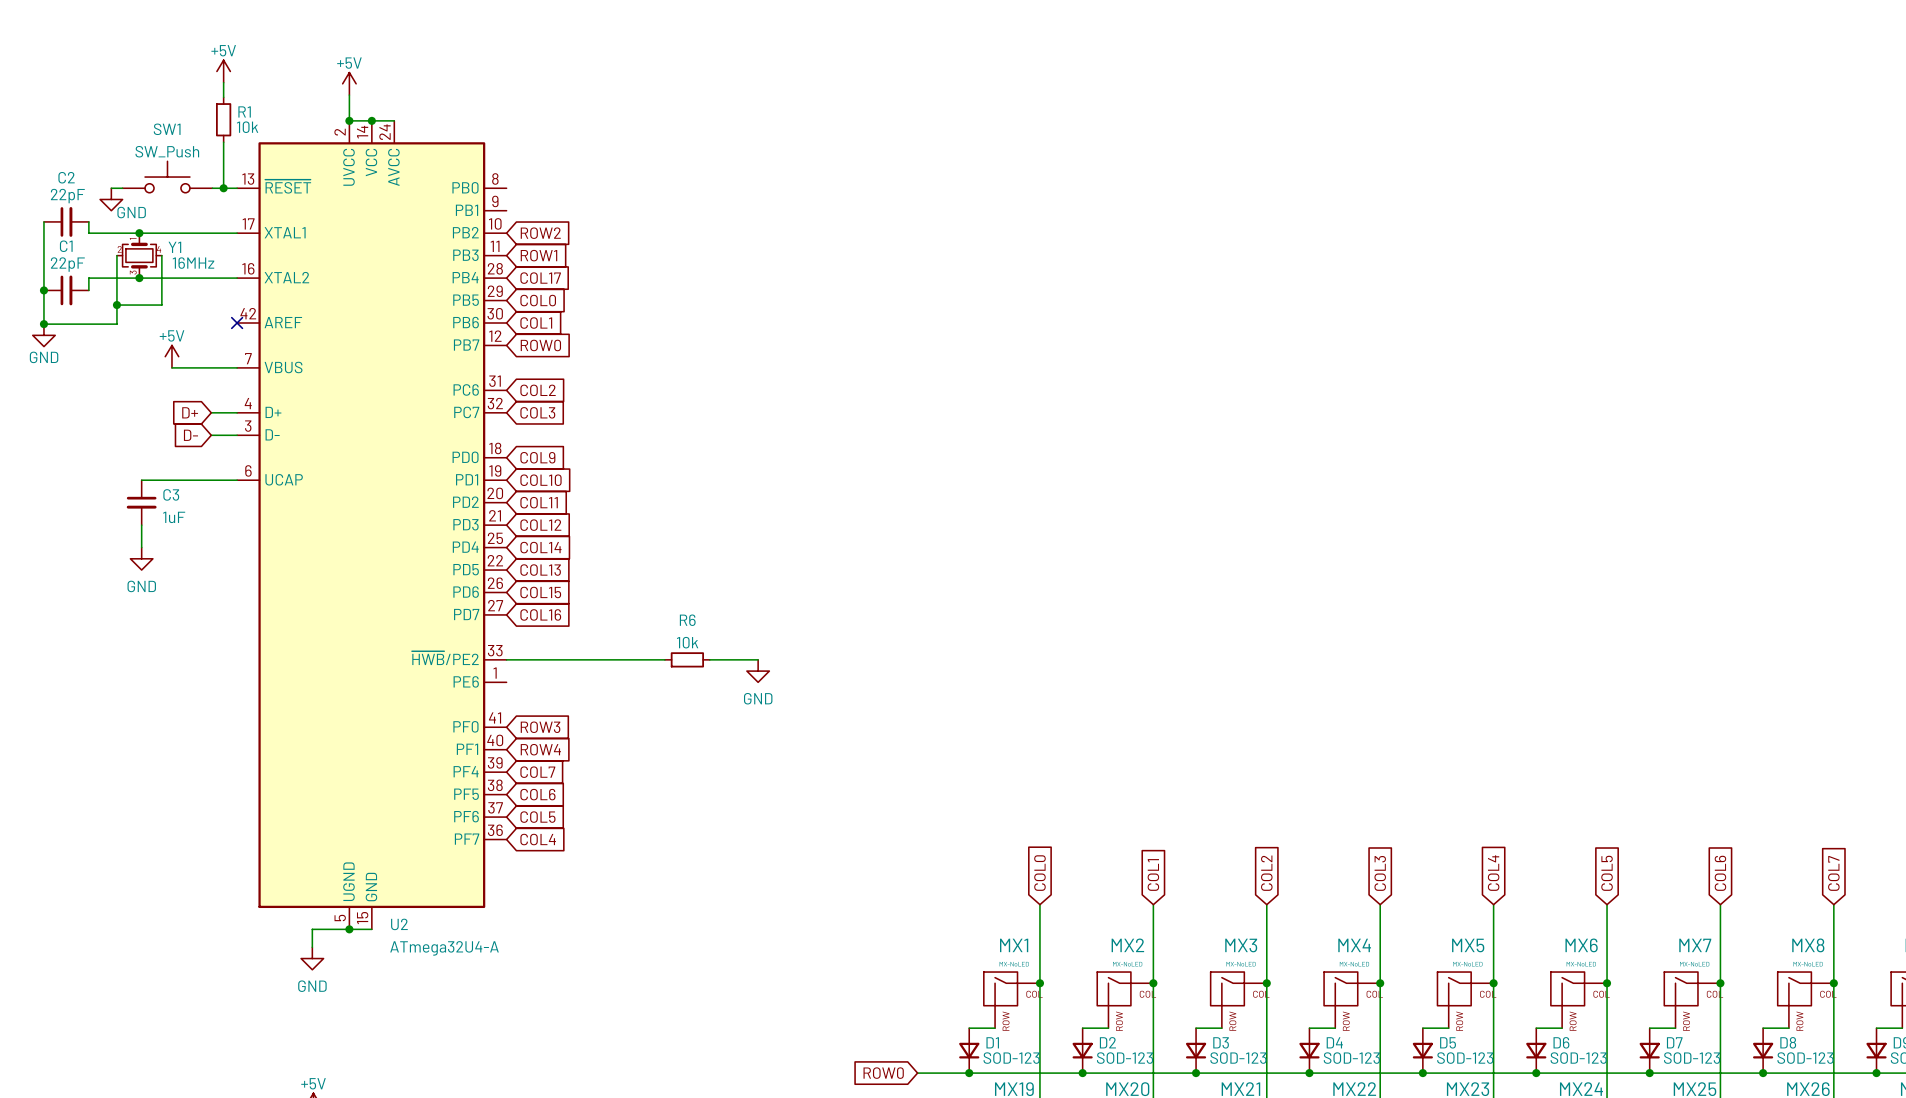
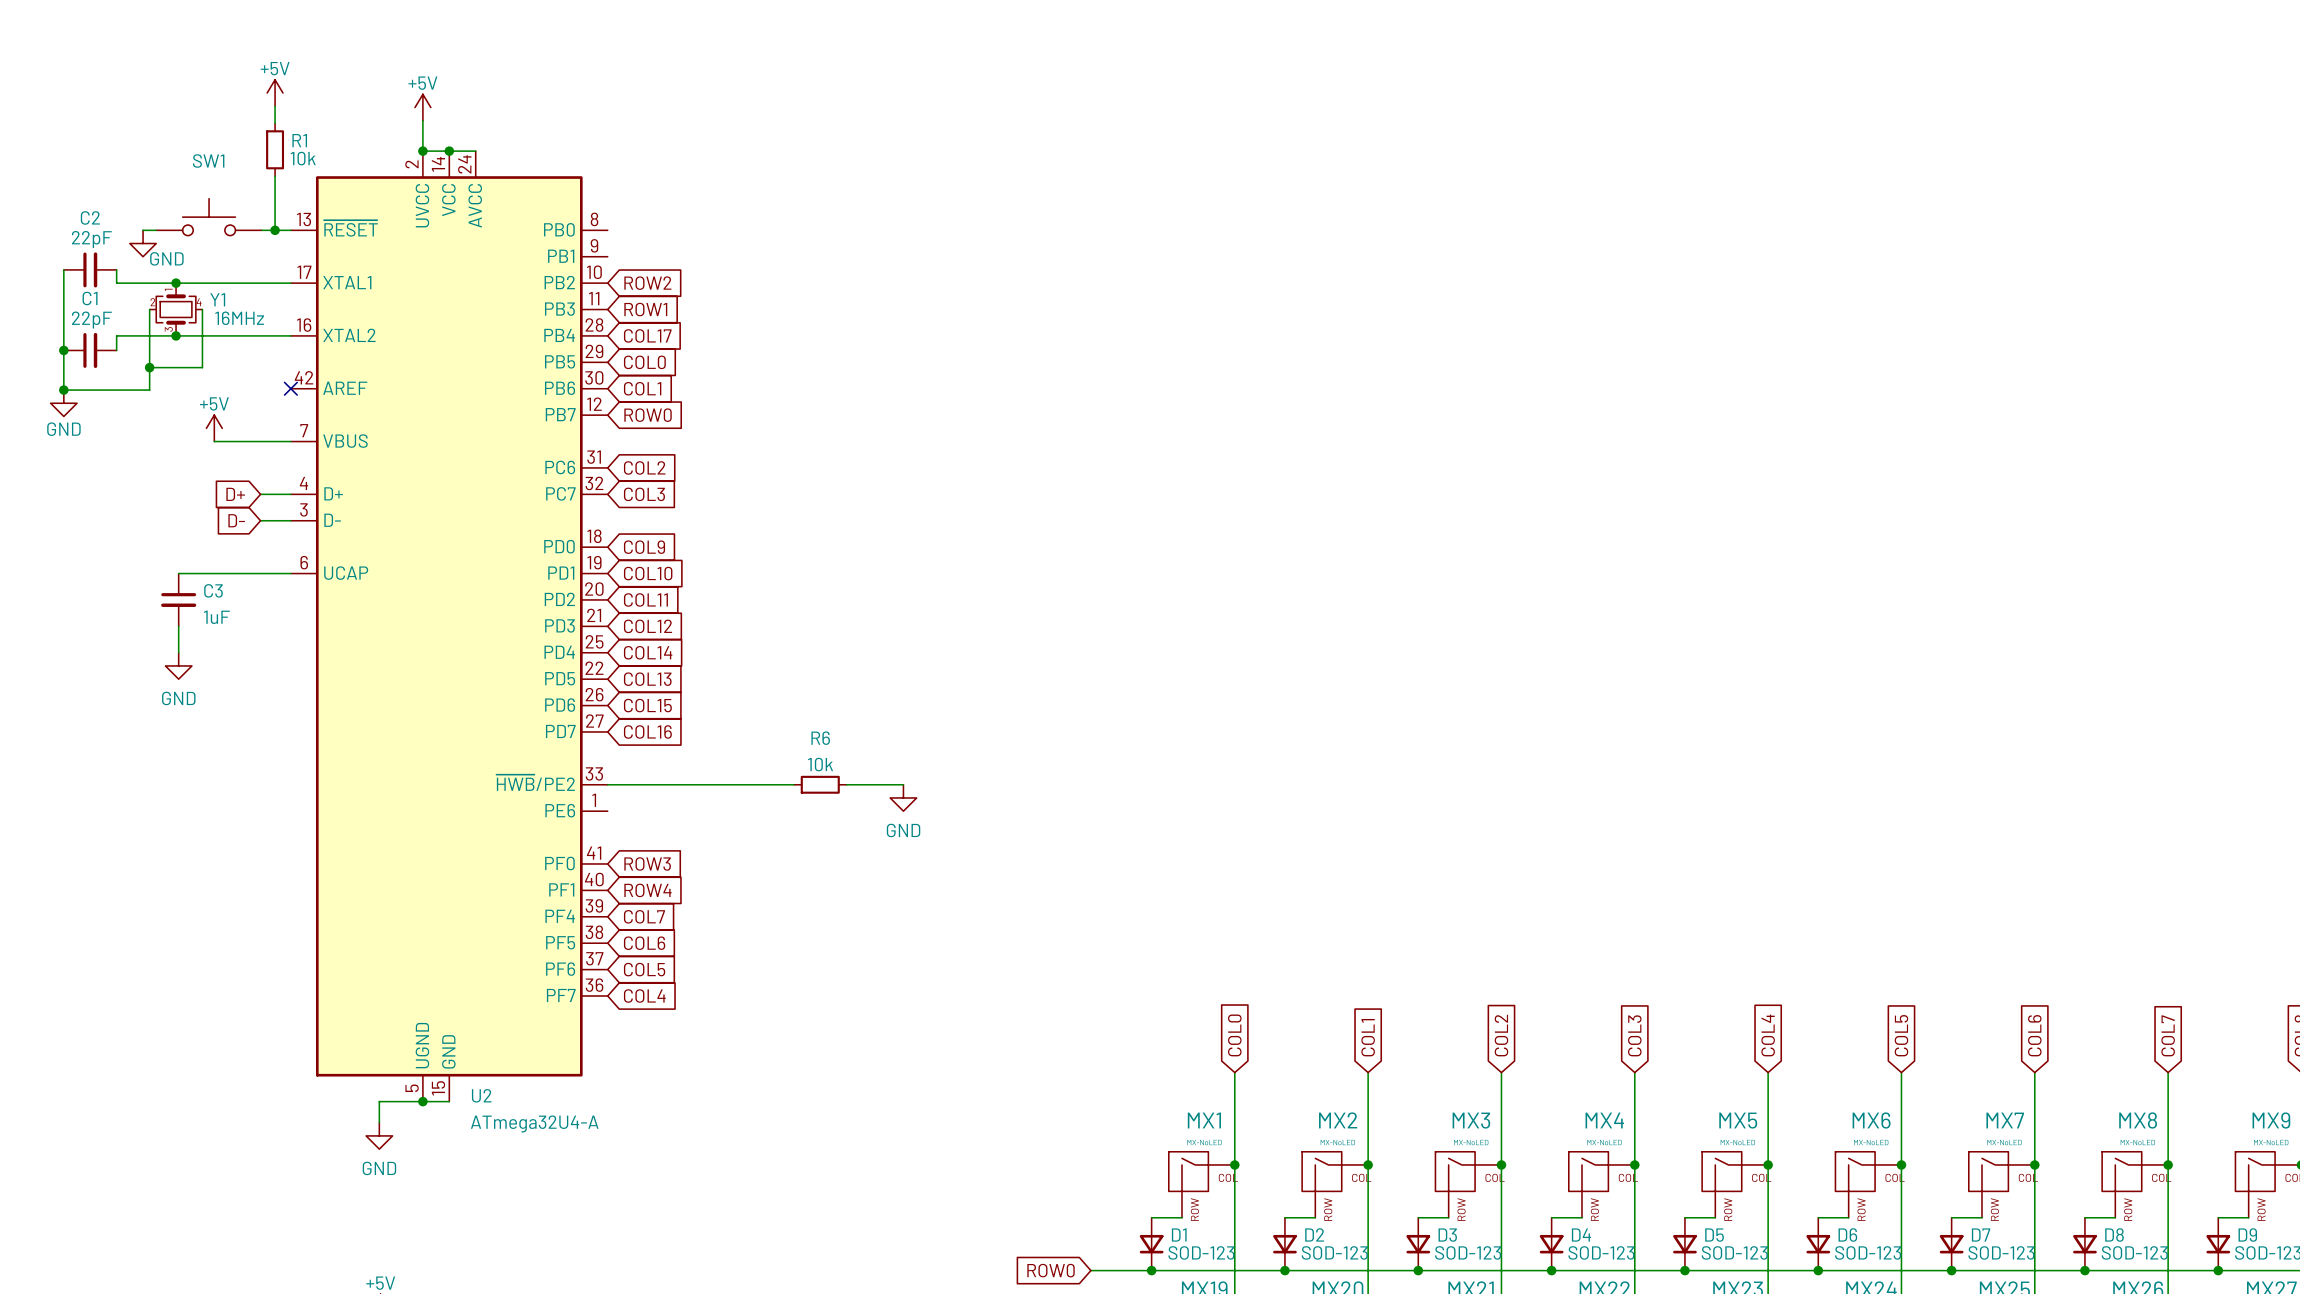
SW1 value: SW_Push (167, 151) -> none

